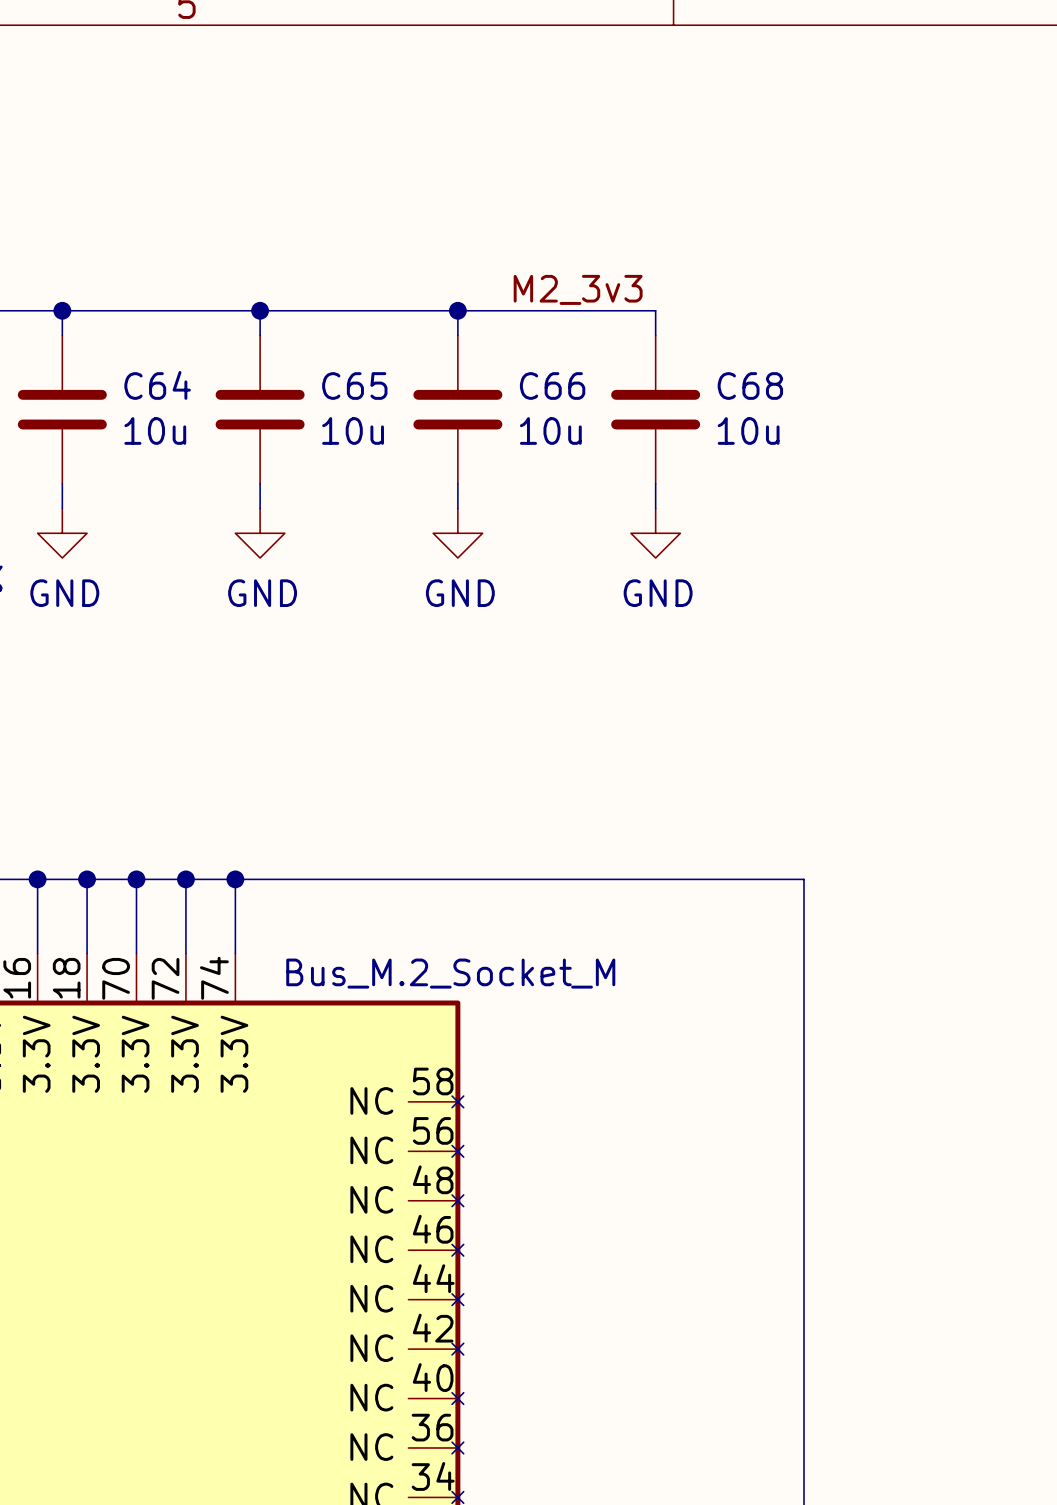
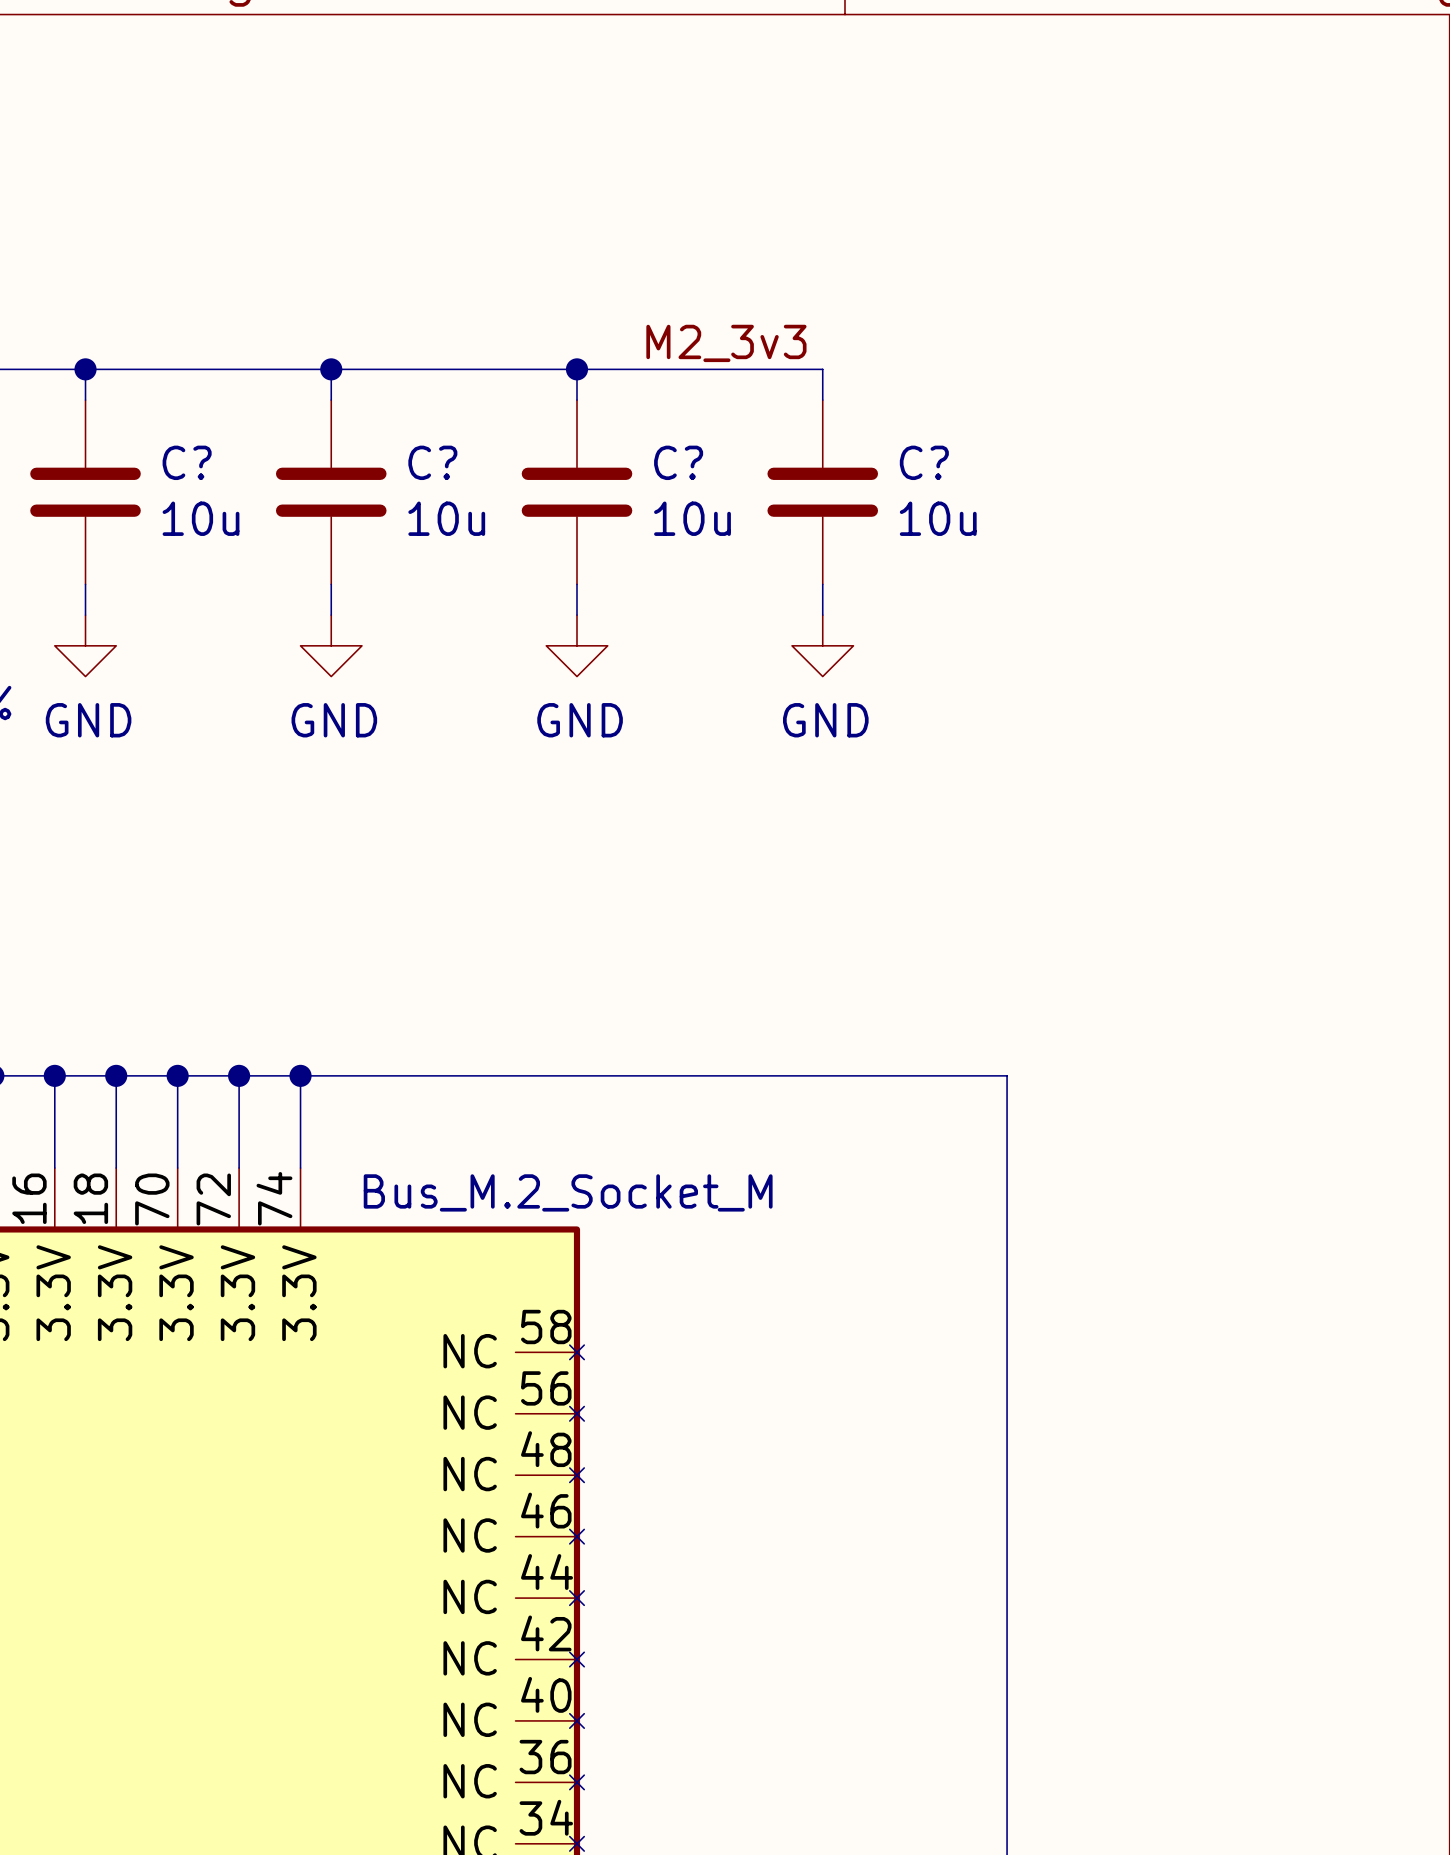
C64 name: C64 (157, 385) -> C? (187, 462)
C65 name: C65 (354, 386) -> C? (432, 462)
C66 name: C66 (552, 386) -> C? (678, 462)
C68 name: C68 (750, 386) -> C? (924, 462)

